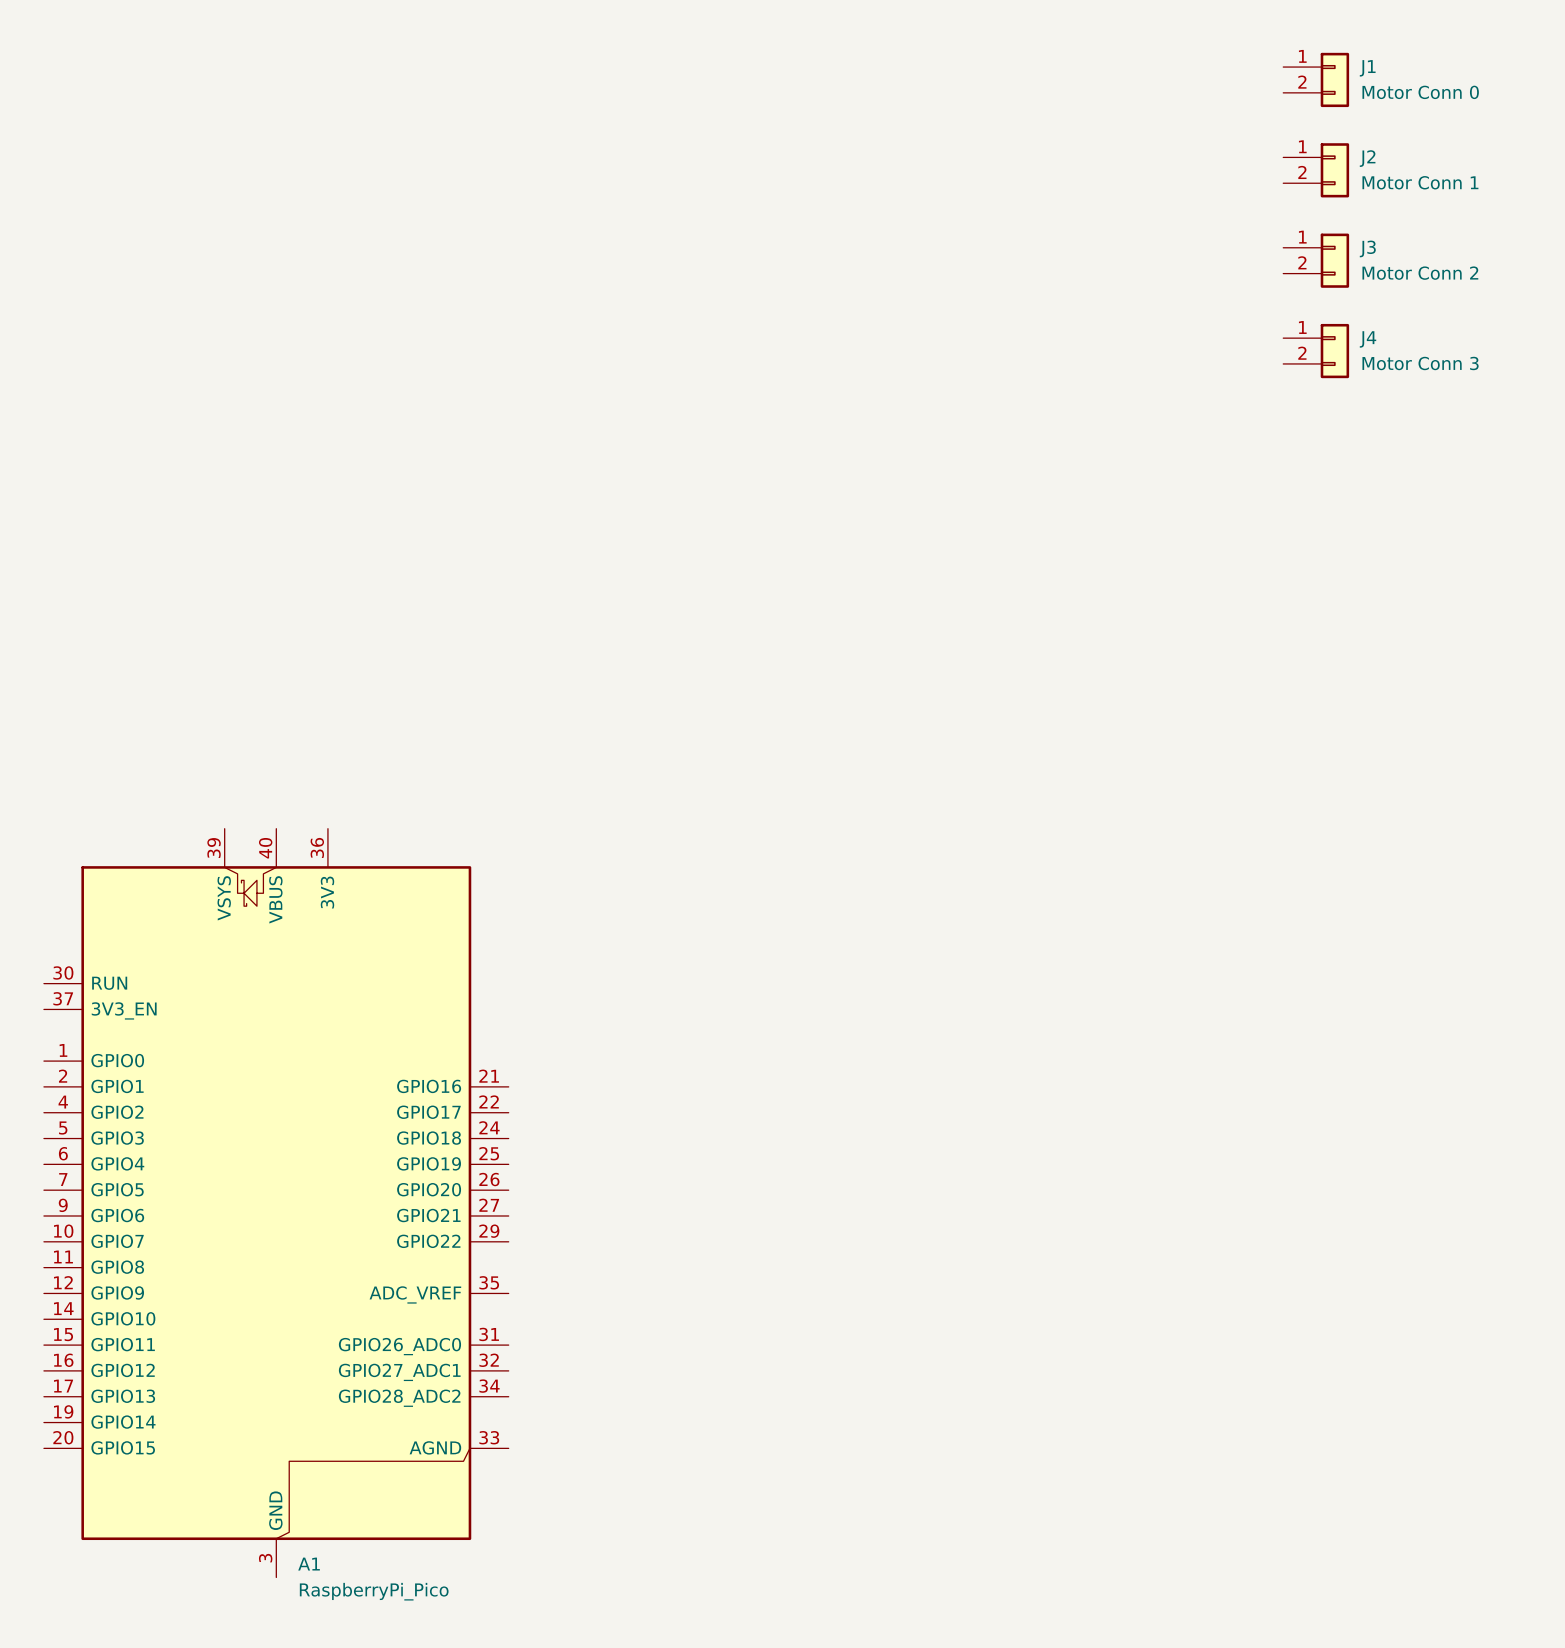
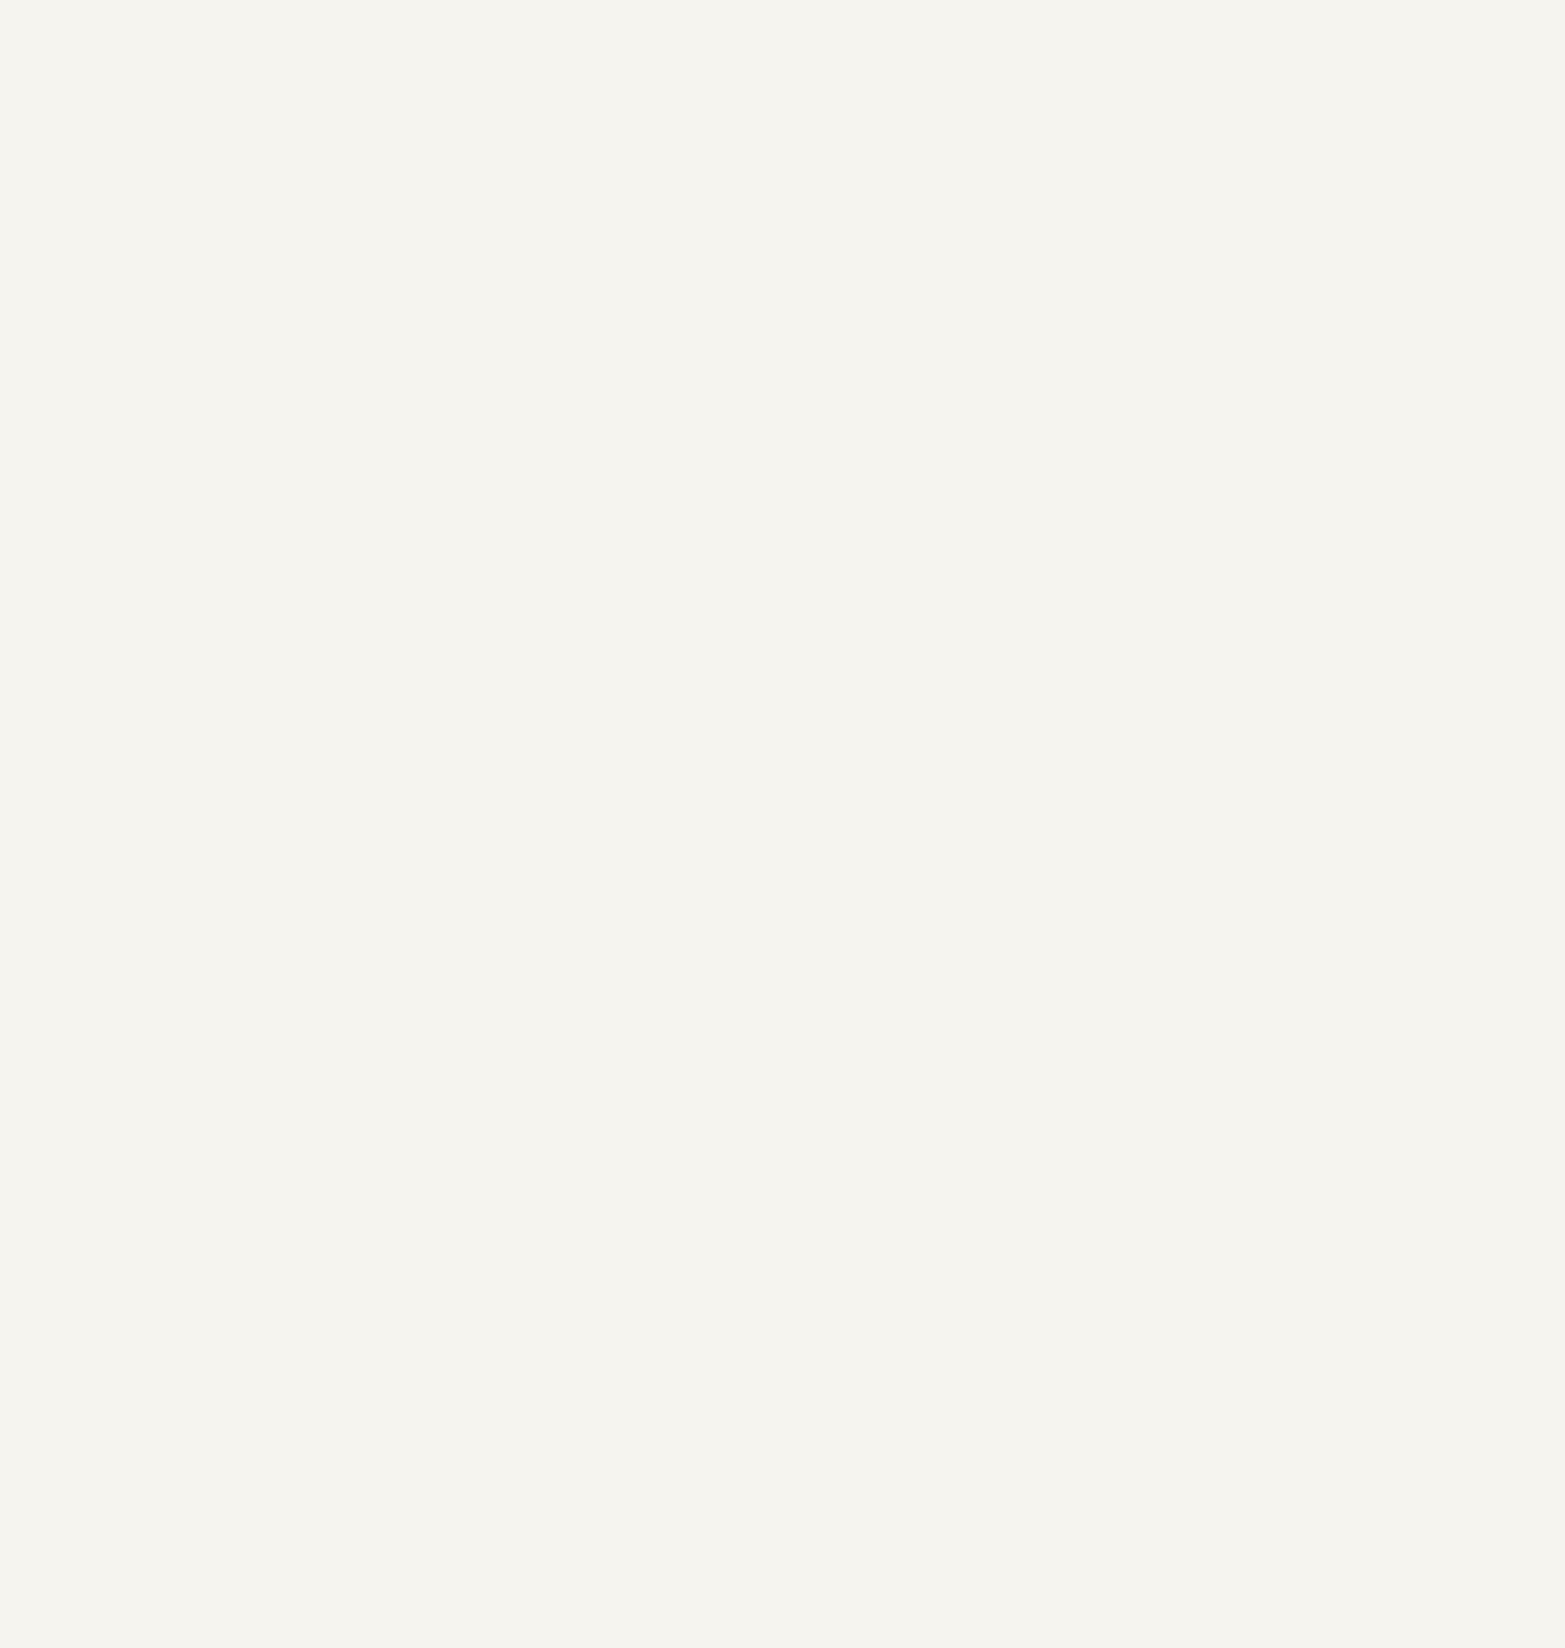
J1: Motor Conn 0 (1316, 79) -> none
J2: Motor Conn 1 (1316, 170) -> none
J3: Motor Conn 2 (1316, 260) -> none
J4: Motor Conn 3 (1316, 351) -> none
A1: RaspberryPi_Pico (276, 1203) -> none

